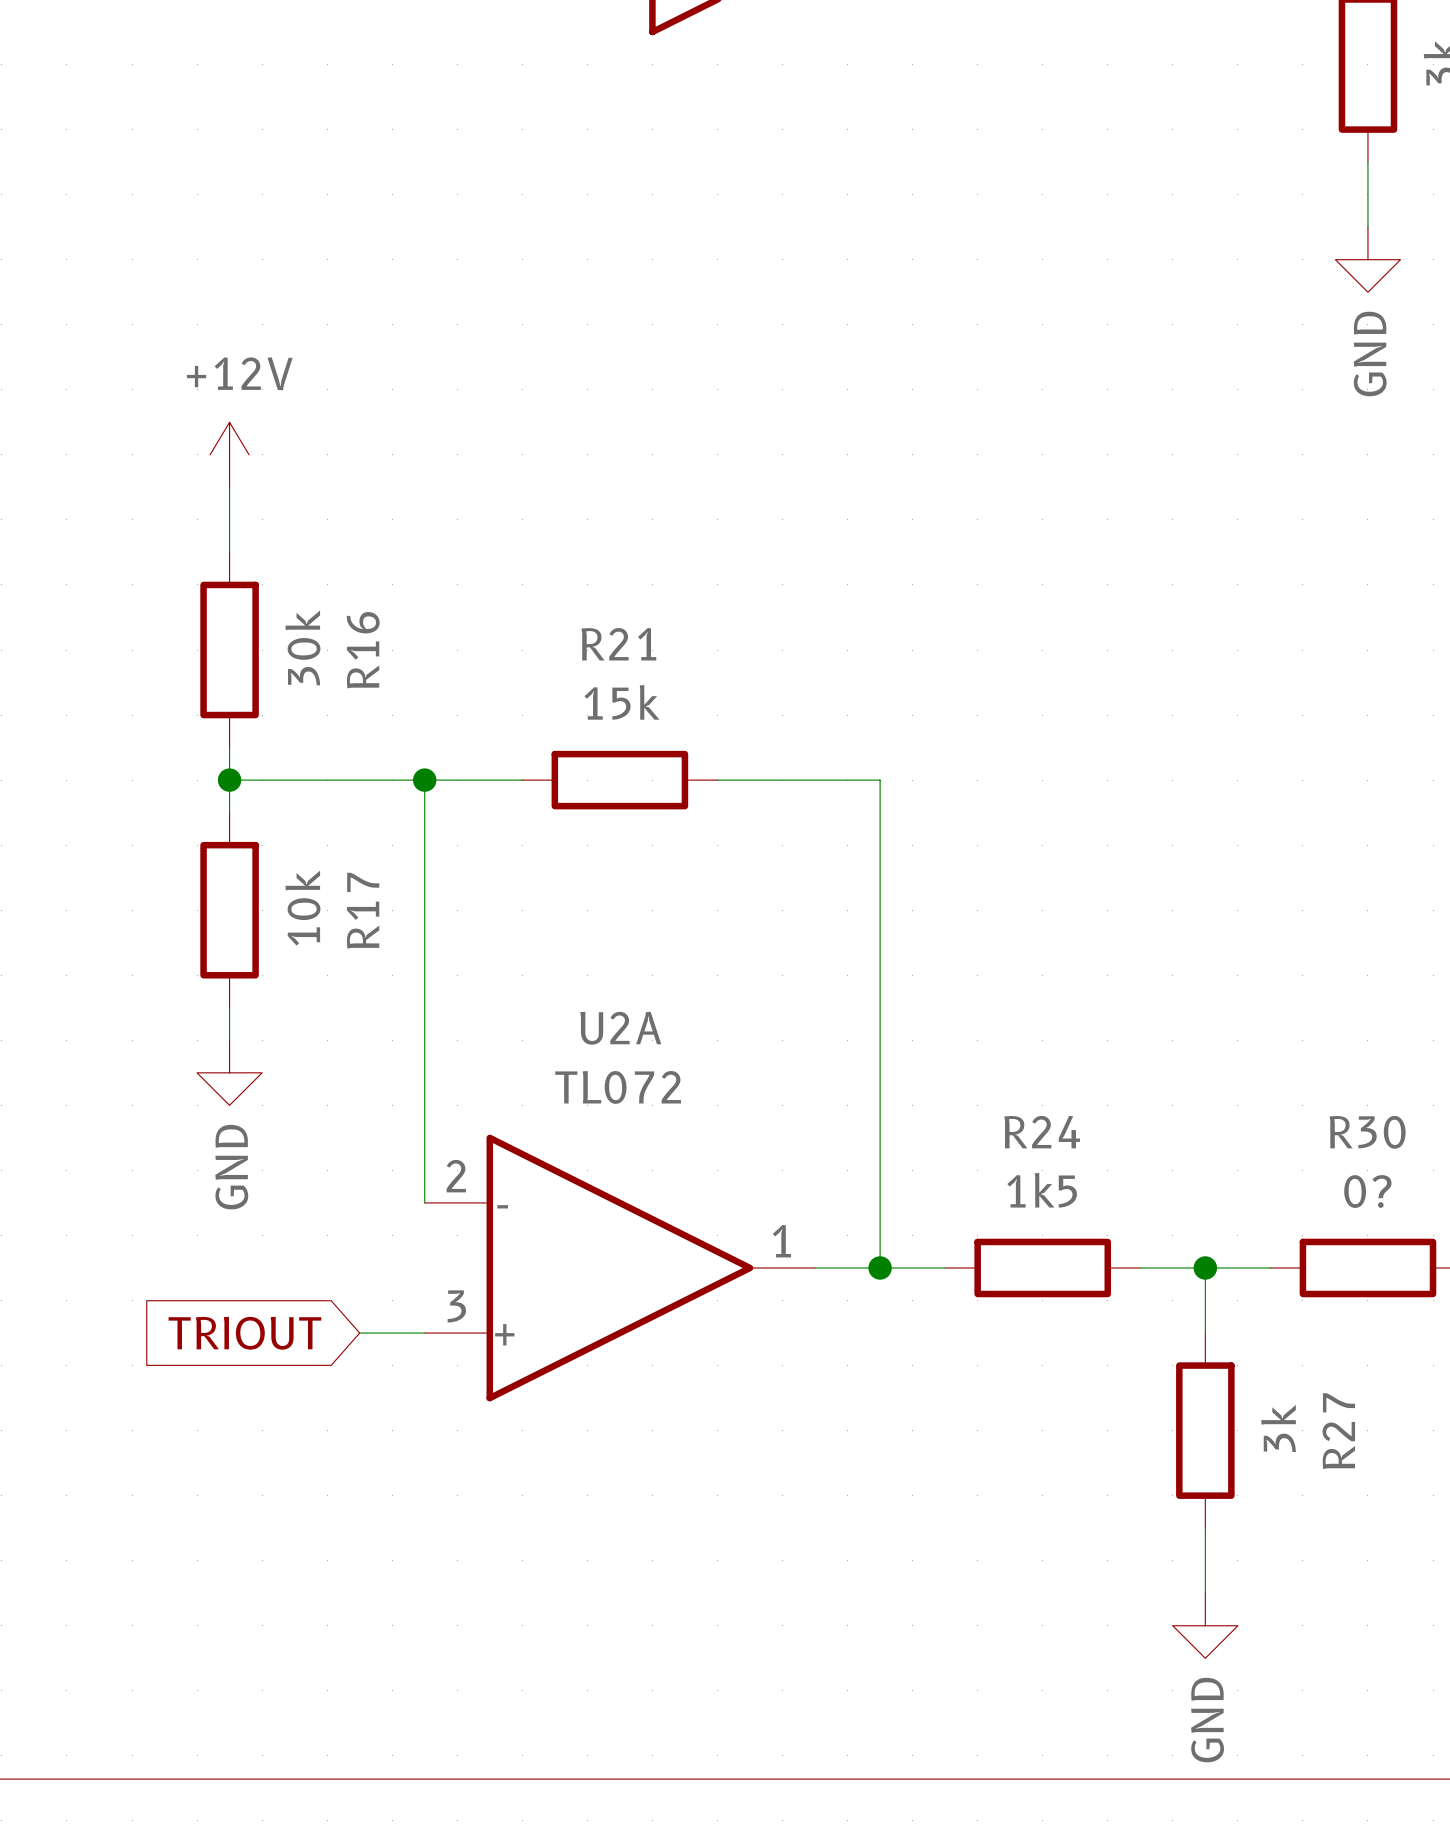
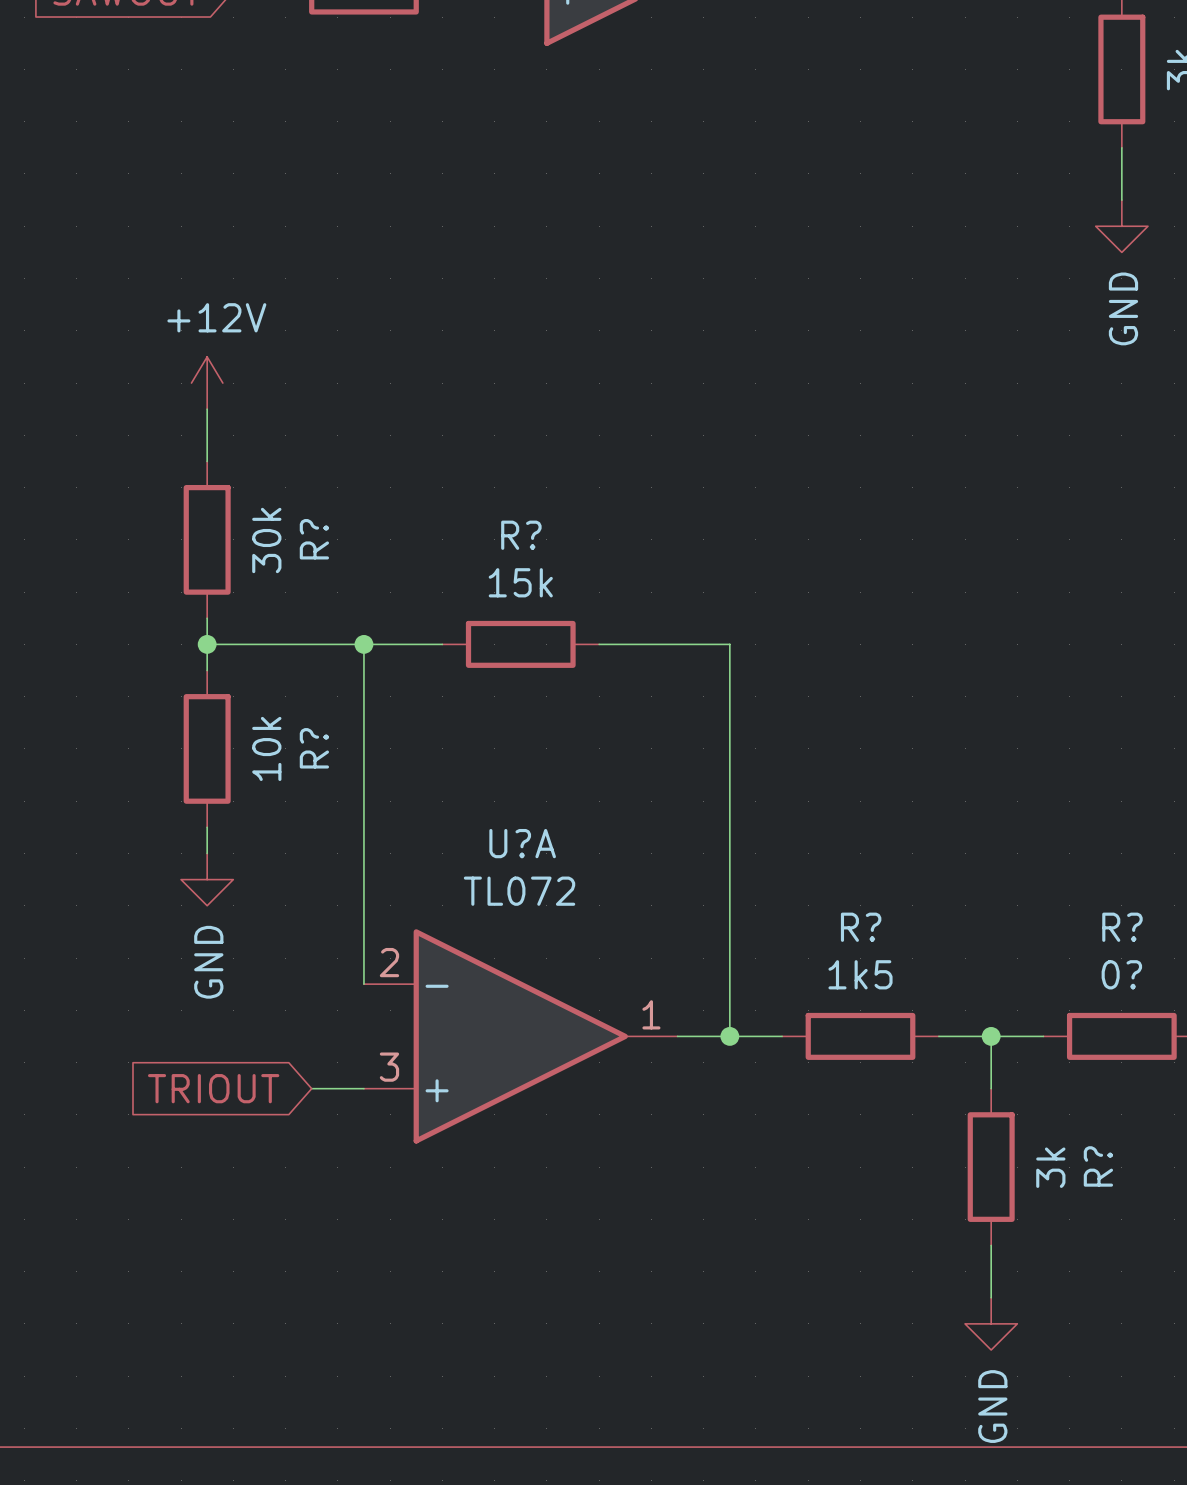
R21 name: R21 (618, 644) -> R? (521, 535)
R16 name: R16 (363, 650) -> R? (314, 539)
R17 name: R17 (363, 910) -> R? (314, 748)
U2A name: U2A (620, 1028) -> U?A (522, 843)
R24 name: R24 (1042, 1132) -> R? (861, 927)
R30 name: R30 (1367, 1132) -> R? (1122, 927)
R27 name: R27 (1338, 1431) -> R? (1098, 1166)

